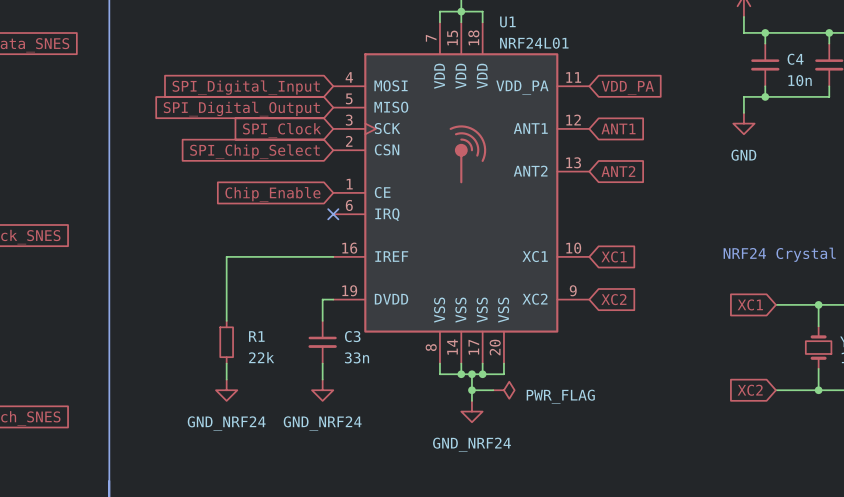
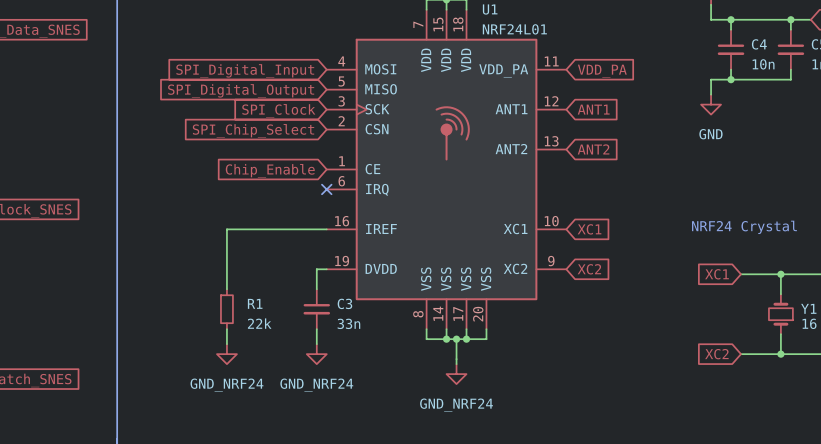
wire: (471, 390) (493, 390) -> none
junction: (471, 390) -> none
power symbol: PWR_FLAG (503, 390) -> none

